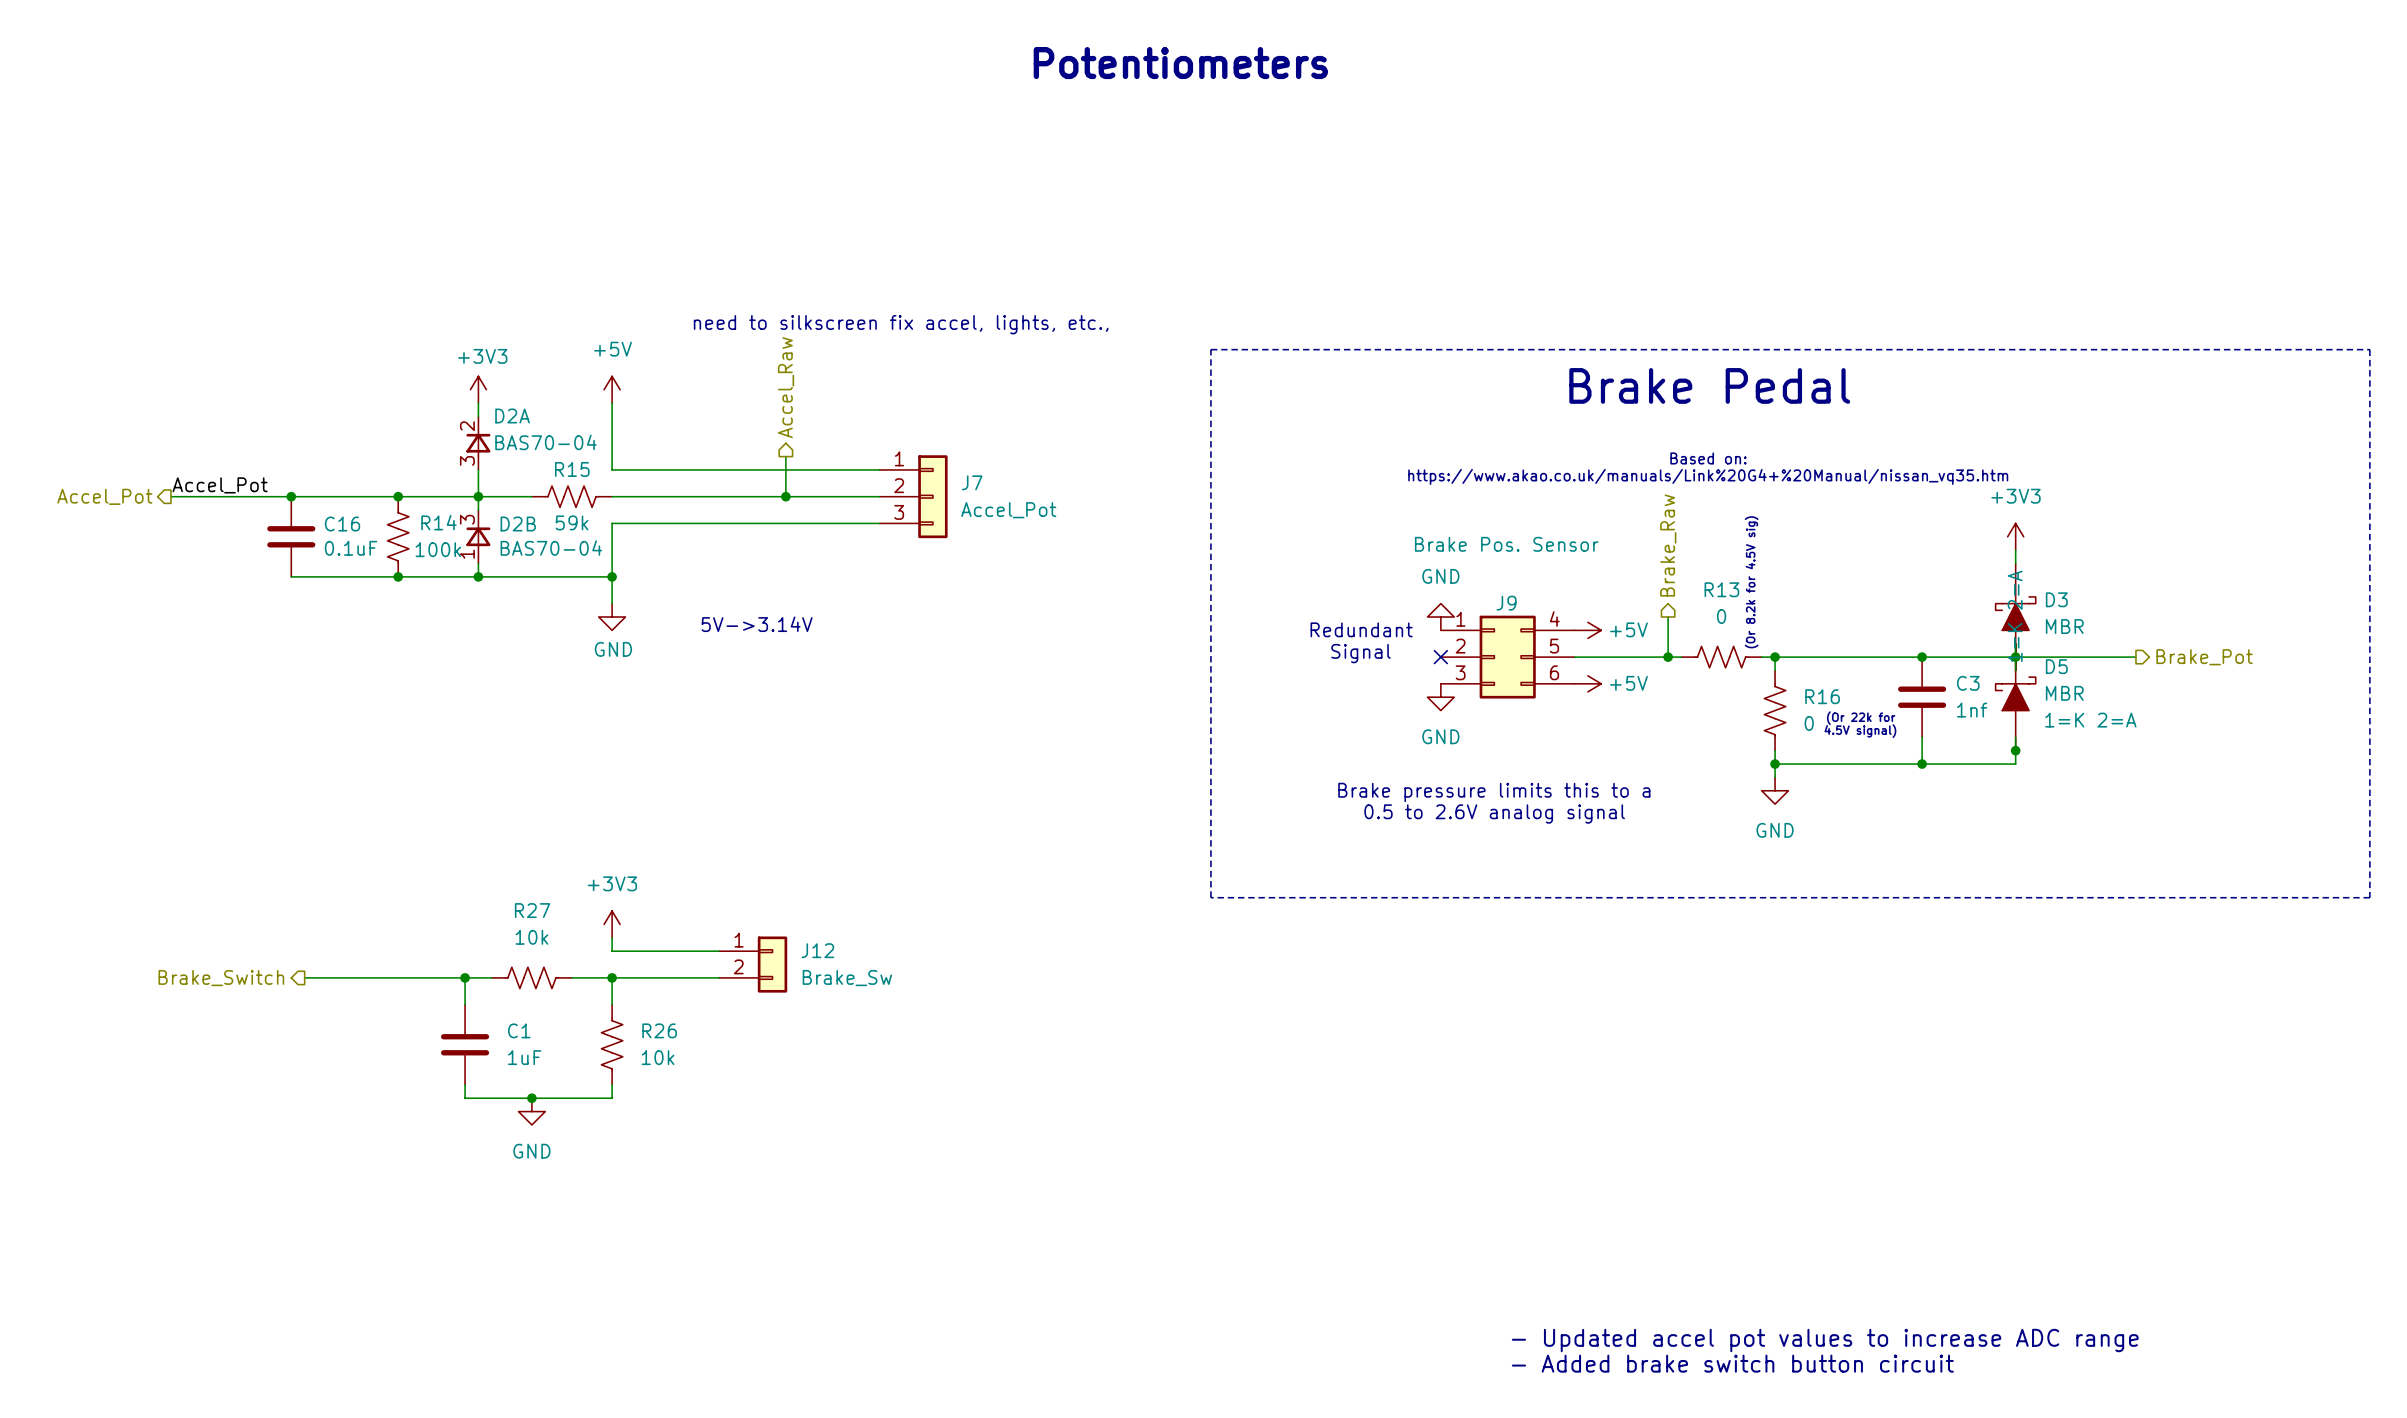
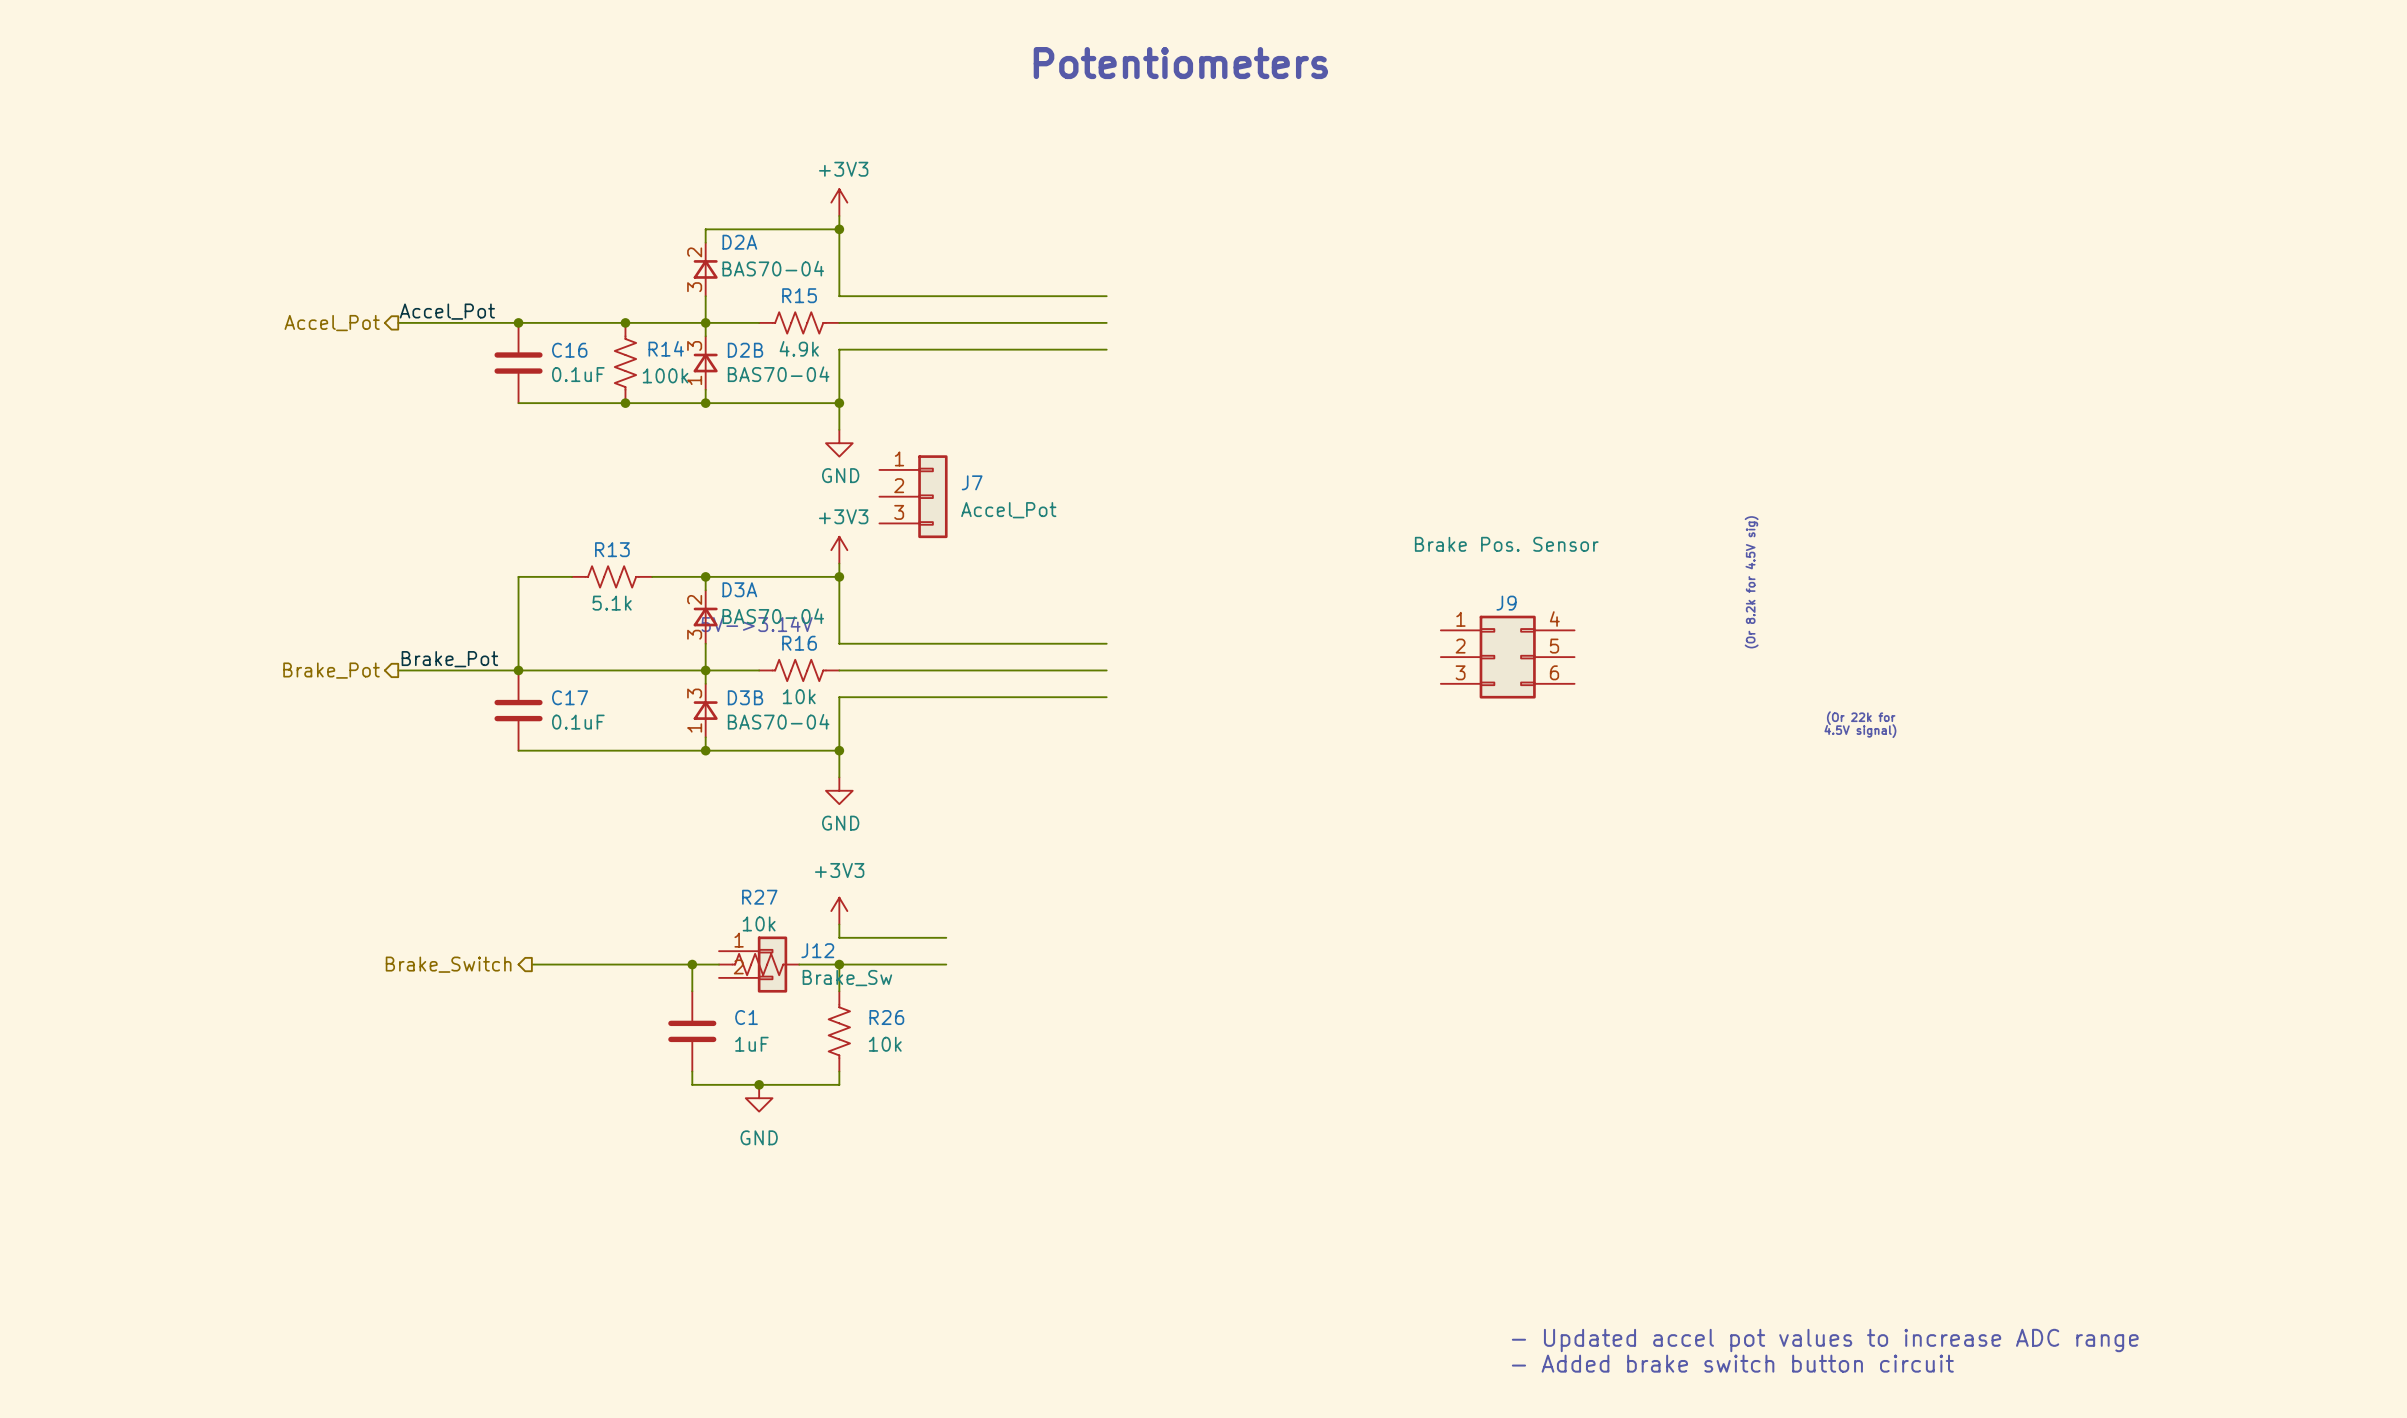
power symbol: none -> +3V3 (839, 202)
wire: none -> (839, 215) (839, 296) (1106, 296)
wire: none -> (839, 229) (705, 229) (705, 242)
junction: none -> (839, 229)
label: none -> Accel_Pot (447, 311)
wire: none -> (398, 322) (759, 322)
junction: none -> (518, 322)
junction: none -> (625, 322)
junction: none -> (705, 322)
wire: none -> (839, 322) (1106, 322)
hierarchical label: none -> Accel_Pot (332, 323)
text: need to silkscreen fix accel, lights, etc., (901, 324) -> none
wire: none -> (1106, 349) (839, 349) (839, 429)
line: (1210, 349) (2369, 349) (2369, 897) (1210, 897) (1210, 349) -> none
text: Brake Pedal (1709, 385) -> none
hierarchical label: Accel_Raw (786, 387) -> none
power symbol: +3V3 (478, 389) -> none
power symbol: +5V (612, 389) -> none
wire: (478, 403) (478, 416) -> (705, 389) (705, 403)
wire: none -> (518, 403) (839, 403)
wire: (612, 403) (612, 469) (879, 469) -> none
junction: none -> (625, 403)
junction: none -> (705, 403)
junction: none -> (839, 403)
D2A position: (478, 443) -> (705, 269)
power symbol: none -> GND (839, 443)
wire: (785, 456) (785, 496) -> (705, 296) (705, 336)
text: Based on: (1708, 458) -> none
wire: (478, 469) (478, 510) -> none
text: https://www.akao.co.uk/manuals/Link%20G4+%20Manual/nissan_vq35.htm (1708, 476) -> none
label: Accel_Pot (220, 485) -> none
hierarchical label: Accel_Pot (104, 496) -> none
wire: (170, 496) (531, 496) -> none
junction: (291, 496) -> none
junction: (398, 496) -> none
junction: (478, 496) -> none
R15 position: (572, 496) -> (799, 322)
wire: (612, 496) (879, 496) -> none
junction: (785, 496) -> none
R15 value: 59k (572, 522) -> 4.9k (799, 348)
wire: (879, 523) (612, 523) (612, 603) -> none
C16 position: (291, 536) -> (518, 363)
R14 position: (398, 536) -> (625, 363)
D2B position: (478, 536) -> (705, 363)
power symbol: +3V3 (2015, 536) -> none
hierarchical label: Brake_Raw (1668, 545) -> none
power symbol: none -> +3V3 (839, 550)
wire: (2015, 550) (2015, 563) -> none
wire: (478, 563) (478, 576) -> (705, 576) (705, 590)
wire: none -> (839, 563) (839, 643) (1106, 643)
wire: (291, 576) (518, 576) -> (518, 670) (518, 576)
junction: (398, 576) -> none
junction: (478, 576) -> none
junction: (612, 576) -> none
wire: none -> (652, 576) (839, 576)
junction: none -> (705, 576)
junction: none -> (839, 576)
R13 name position: R13 (1721, 589) -> R13 (612, 549)
R13 value: 0 (1721, 616) -> 5.1k (612, 603)
power symbol: GND (612, 617) -> none
D3A: none -> BAS70-04 (705, 617)
power symbol: GND (1440, 617) -> none
wire: (1668, 617) (1668, 657) -> none
D3: MBR (2015, 617) -> none
text: Redundant (1361, 629) -> none
power symbol: +5V (1587, 630) -> none
wire: none -> (705, 643) (705, 683)
wire: (2015, 643) (2015, 670) -> none
text: Signal (1360, 653) -> none
no-connect mark: (1440, 657) -> none
wire: (1574, 657) (1681, 657) -> none
junction: (1668, 657) -> none
R13 position: (1721, 657) -> (612, 576)
wire: (1761, 657) (2135, 657) -> none
wire: (1775, 657) (1775, 670) -> none
junction: (1775, 657) -> none
junction: (1922, 657) -> none
junction: (2015, 657) -> none
hierarchical label: Brake_Pot (2204, 657) -> none
label: none -> Brake_Pot (449, 659)
hierarchical label: none -> Brake_Pot (331, 670)
wire: none -> (398, 670) (759, 670)
junction: none -> (518, 670)
junction: none -> (705, 670)
wire: none -> (839, 670) (1106, 670)
power symbol: +5V (1587, 683) -> none
R16 name position: R16 (1822, 696) -> R16 (799, 643)
wire: none -> (1106, 697) (839, 697) (839, 777)
power symbol: GND (1440, 697) -> none
C3: 1nf (1922, 697) -> none
D5: MBR (2015, 697) -> none
C17: none -> 0.1uF (518, 710)
D3B: none -> BAS70-04 (705, 710)
R16 rotation: 0° (1775, 710) -> 90° clockwise (799, 670)
R16 position: (1775, 710) -> (799, 670)
R16 value: 0 (1809, 723) -> 10k (799, 696)
wire: none -> (705, 737) (705, 750)
wire: (1922, 737) (1922, 764) -> none
wire: (2015, 737) (2015, 764) (1775, 764) -> none
wire: none -> (518, 750) (839, 750)
junction: none -> (705, 750)
junction: none -> (839, 750)
wire: (1775, 750) (1775, 777) -> none
junction: (2015, 750) -> none
junction: (1775, 764) -> none
junction: (1922, 764) -> none
power symbol: none -> GND (839, 790)
power symbol: GND (1775, 790) -> none
text: Brake pressure limits this to a (1494, 792) -> none
text: 0.5 to 2.6V analog signal (1494, 814) -> none
power symbol: none -> +3V3 (839, 911)
power symbol: +3V3 (612, 924) -> none
wire: (612, 937) (612, 951) (719, 951) -> (839, 924) (839, 937) (946, 937)
junction: none -> (692, 964)
junction: none -> (839, 964)
wire: (304, 977) (491, 977) -> (531, 964) (719, 964)
wire: (465, 977) (465, 1004) -> (692, 964) (692, 991)
junction: (465, 977) -> none
R27 position: (531, 977) -> (759, 964)
wire: (572, 977) (719, 977) -> (799, 964) (946, 964)
wire: (612, 977) (612, 1004) -> (839, 964) (839, 991)
junction: (612, 977) -> none
hierarchical label position: Brake_Switch (221, 978) -> Brake_Switch (448, 964)
C1 position: (465, 1044) -> (692, 1031)
R26 position: (612, 1044) -> (839, 1031)
wire: (465, 1084) (465, 1098) (612, 1098) (612, 1084) -> (692, 1071) (692, 1084) (839, 1084) (839, 1071)
junction: none -> (759, 1084)
junction: (531, 1098) -> none
power symbol: none -> GND (759, 1098)
power symbol: GND (531, 1111) -> none

